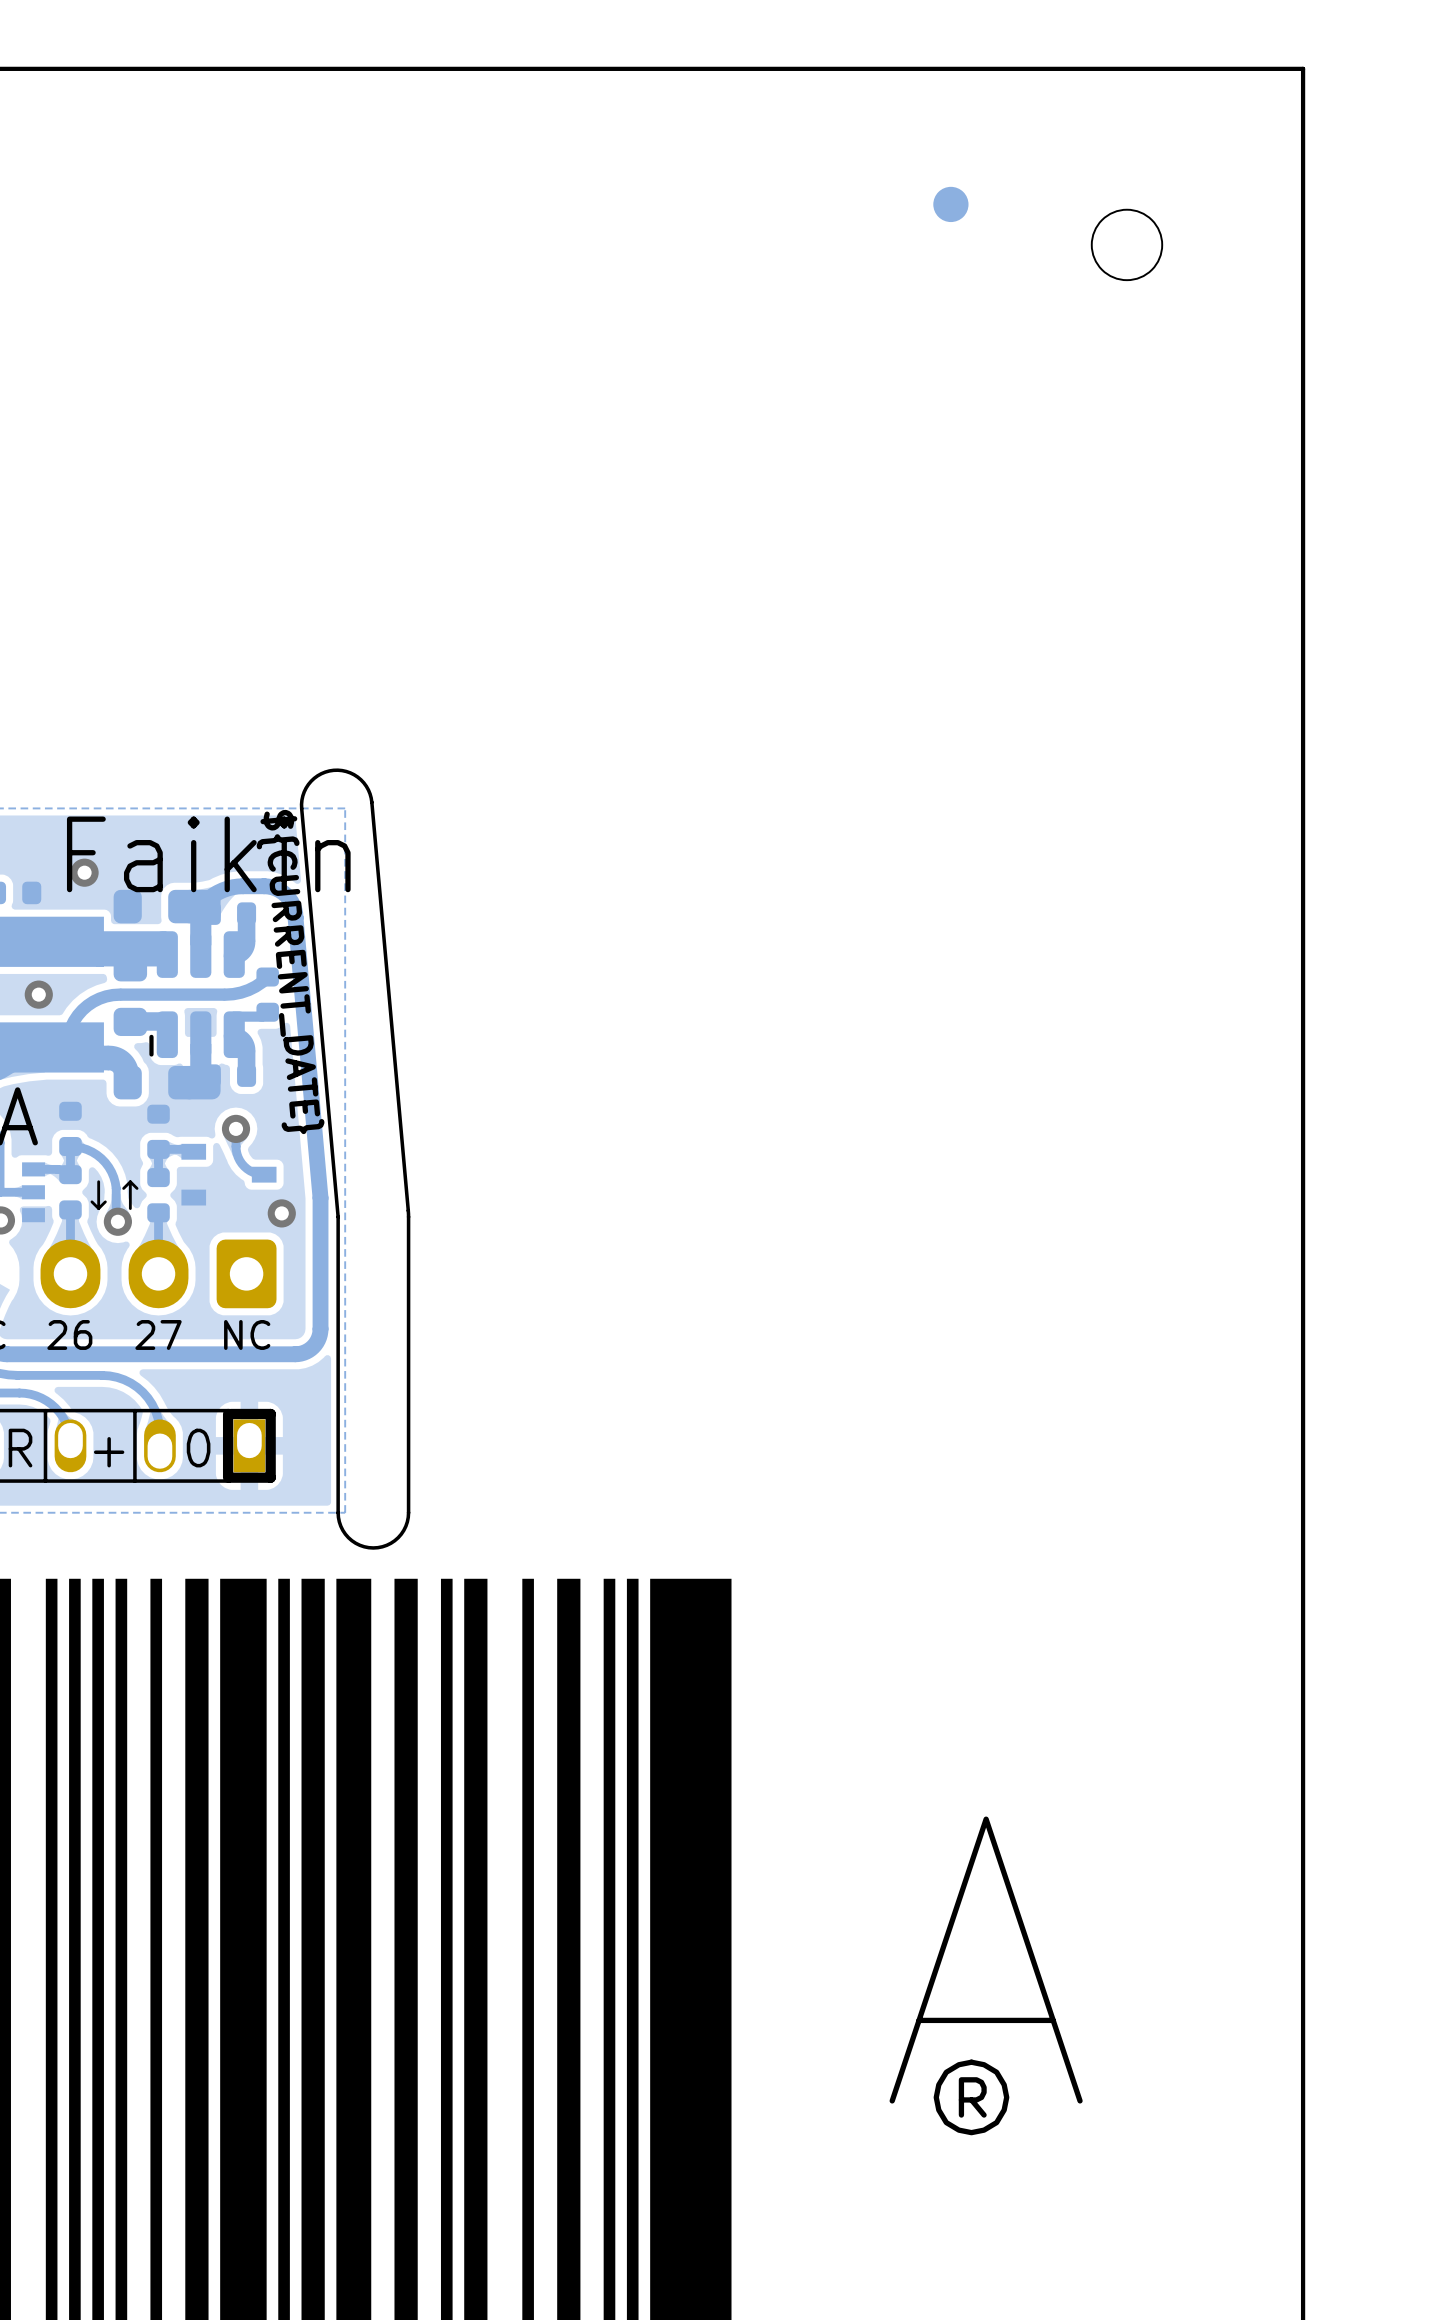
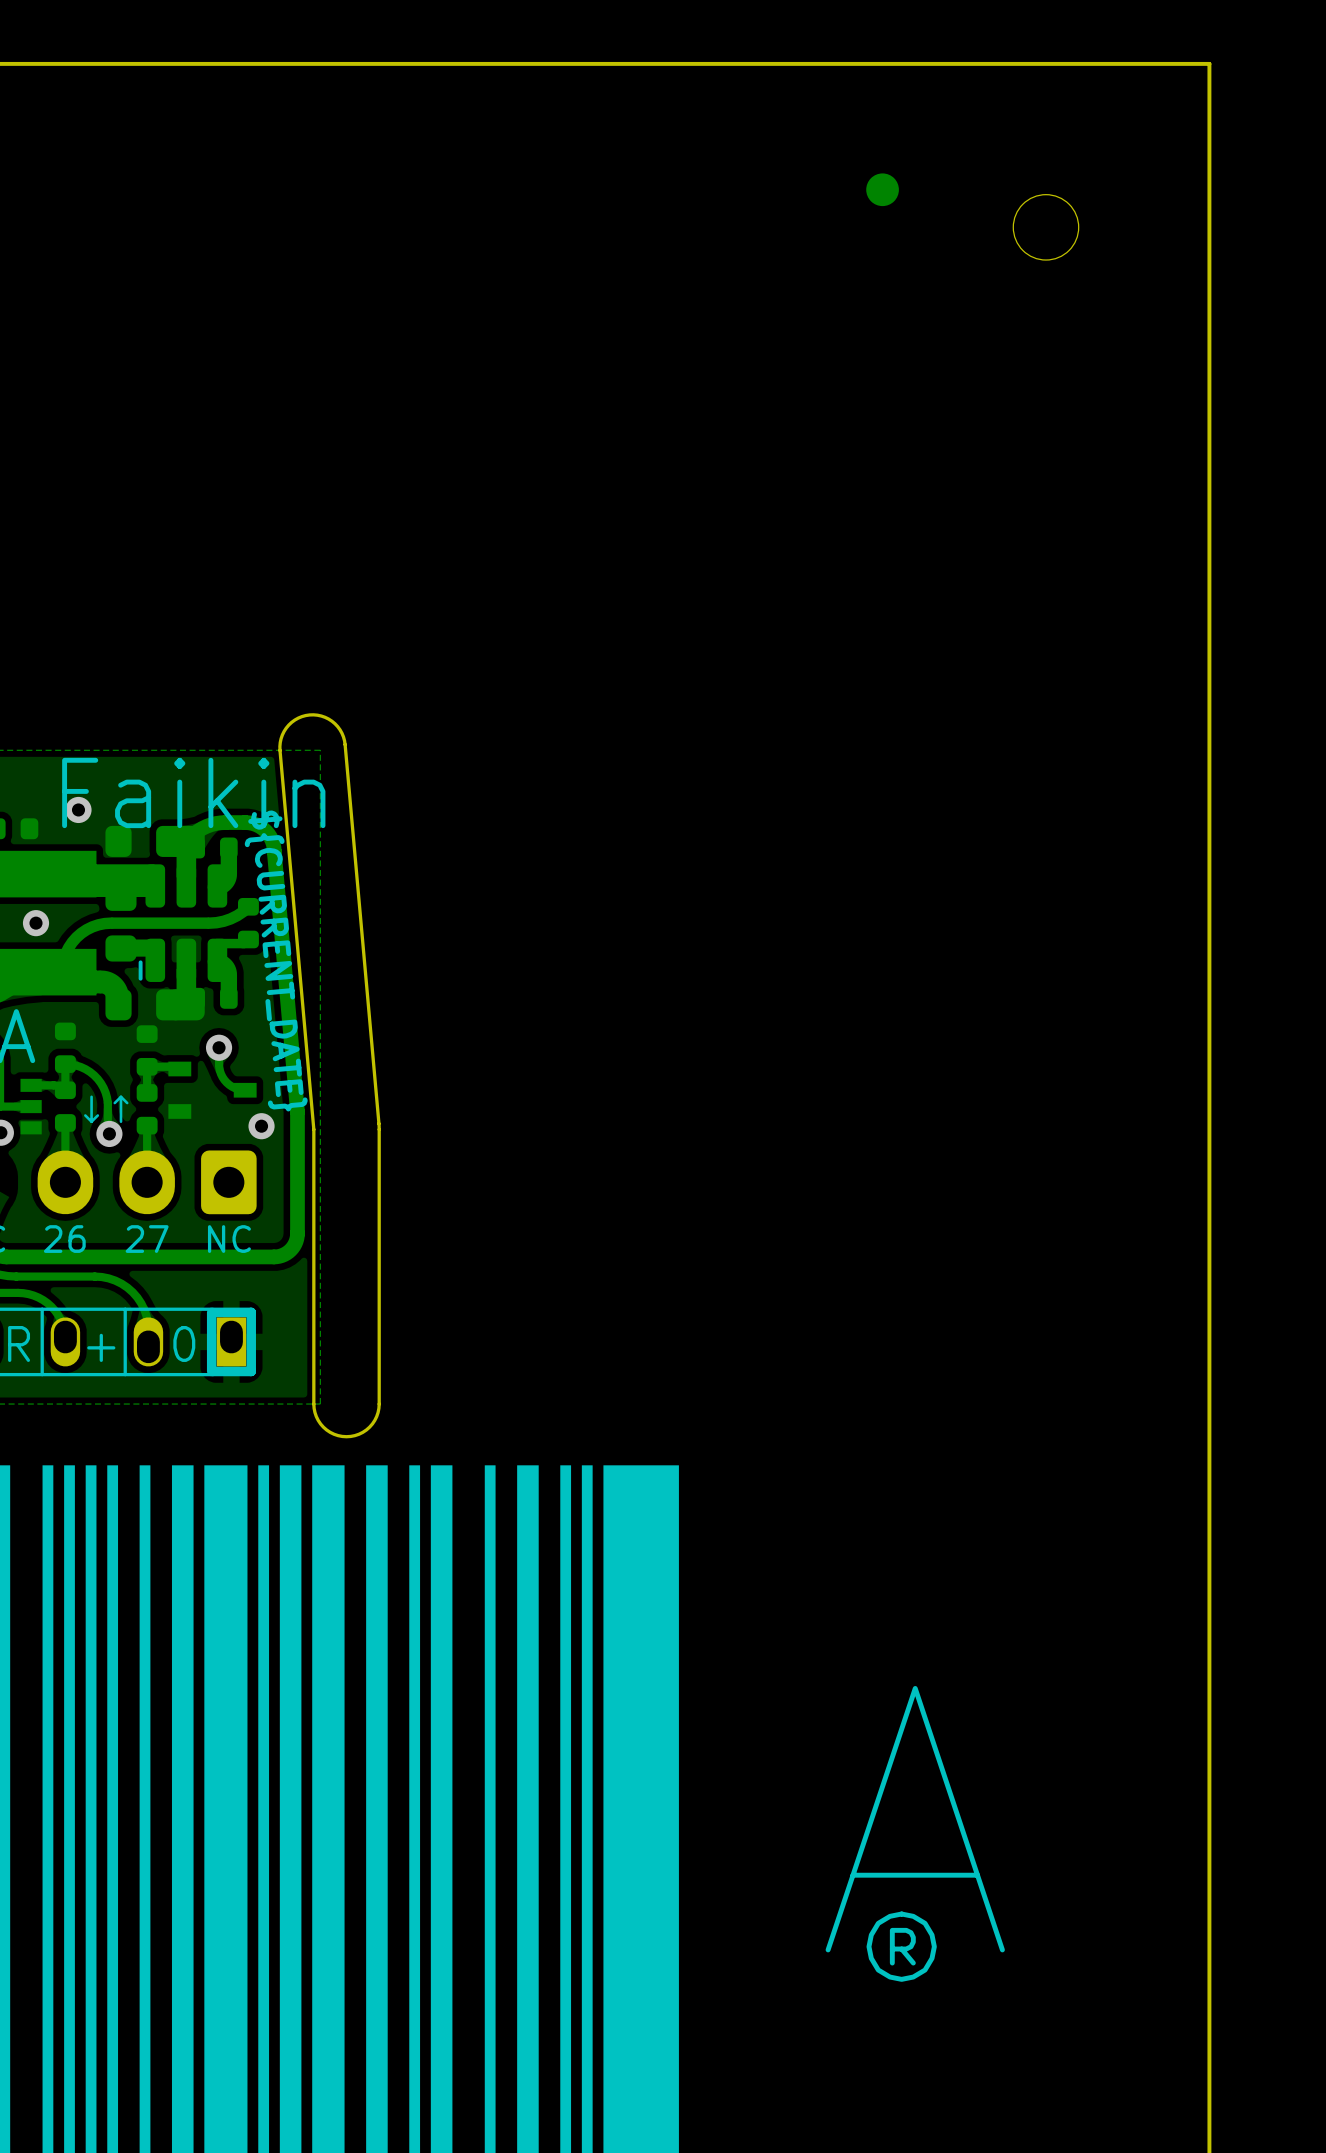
text position: ${CURRENT_DATE} (290, 972) -> ${CURRENT_DATE} (276, 960)

